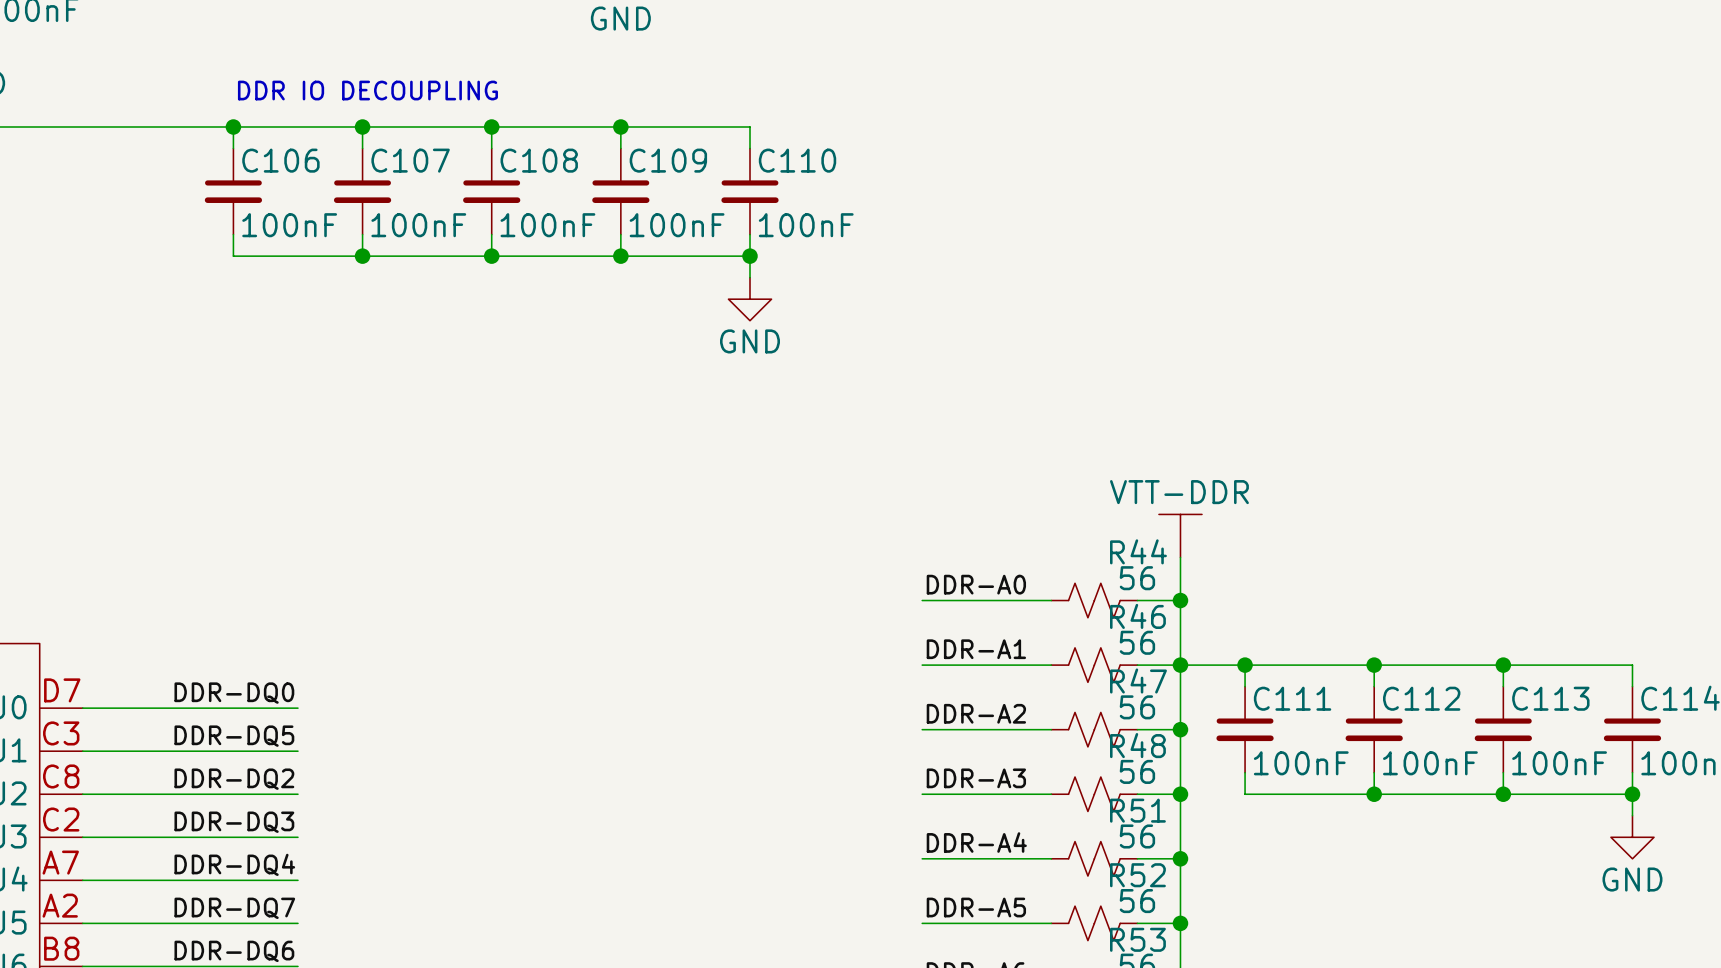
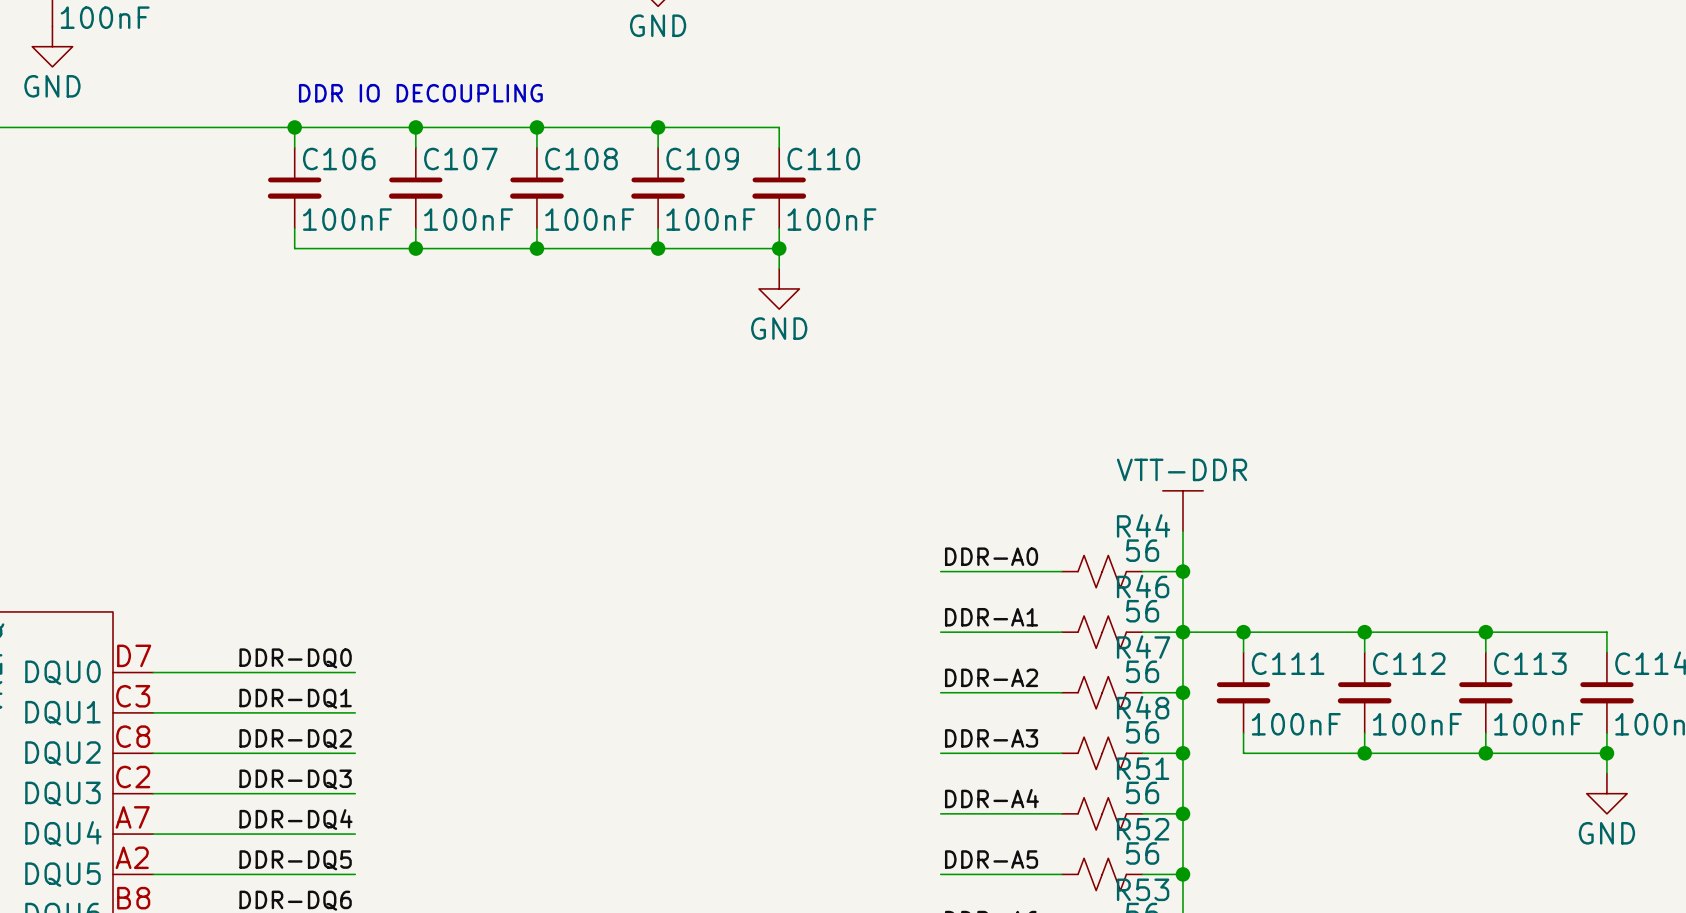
label: DDR-DQ5 (234, 736) -> DDR-DQ1 (295, 698)
label: DDR-DQ7 (234, 908) -> DDR-DQ5 (295, 860)

